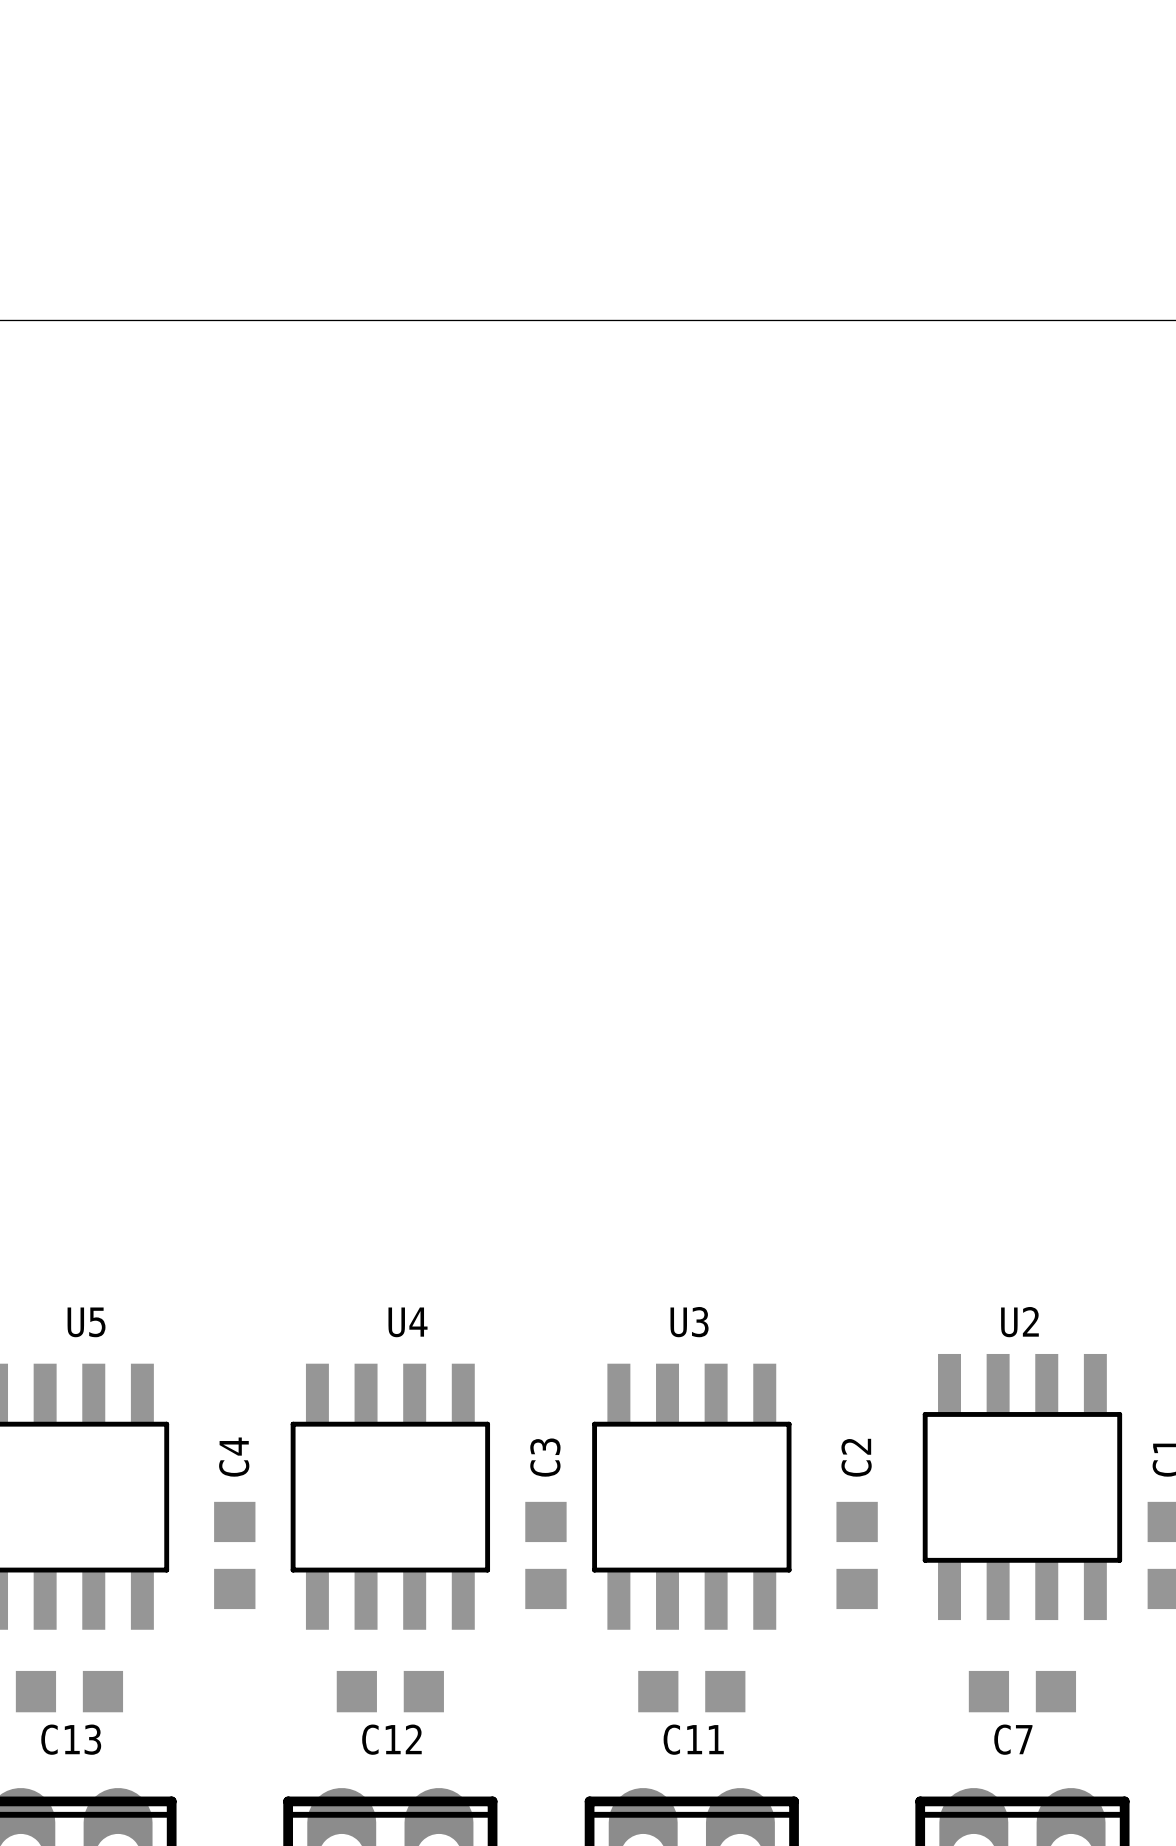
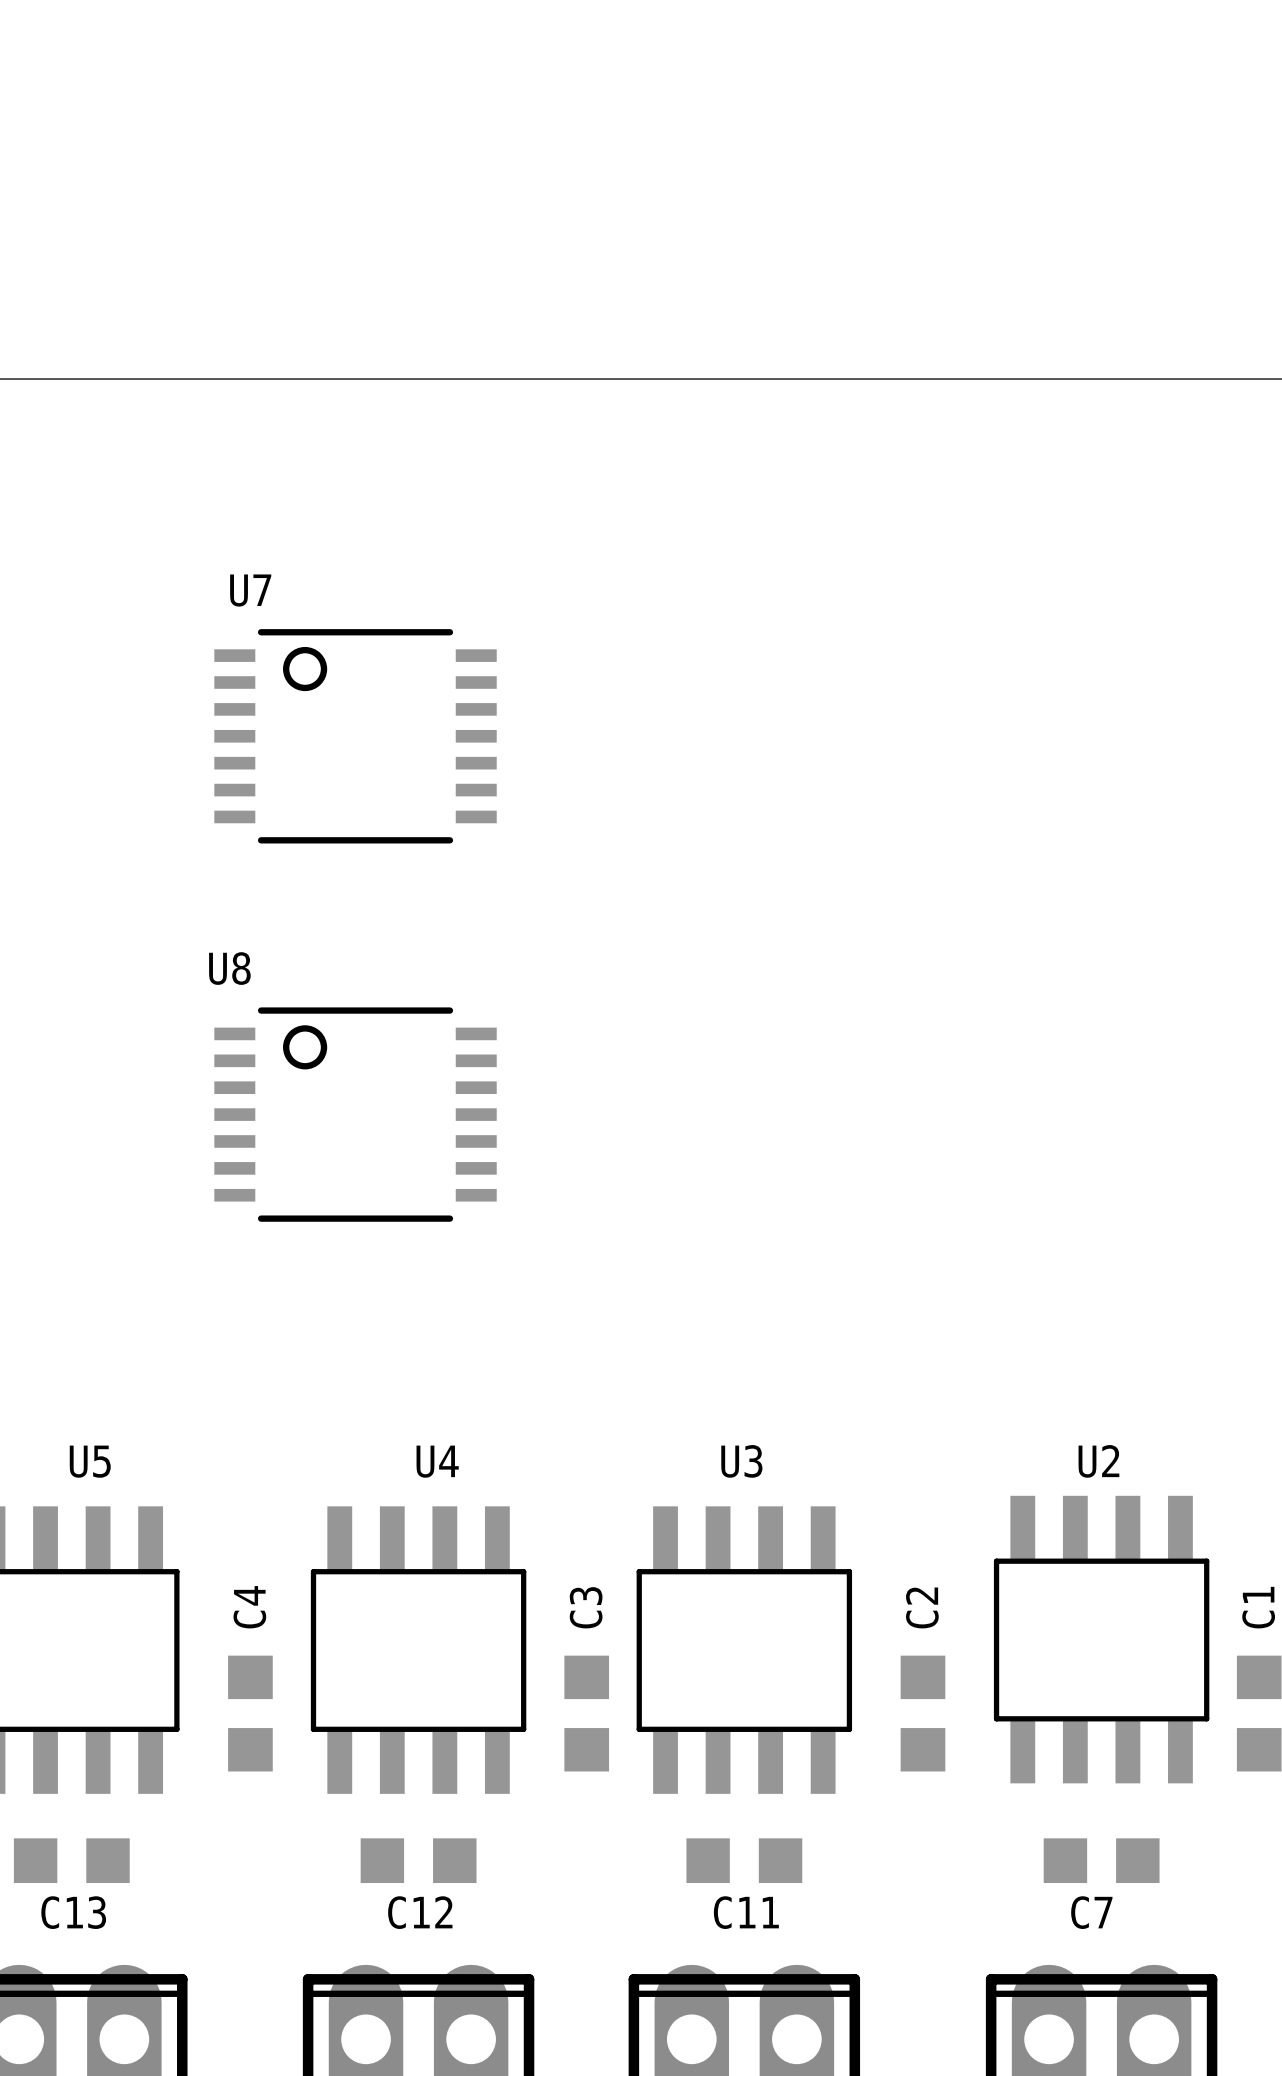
U7: none -> (355, 736)
U8: none -> (355, 1114)

